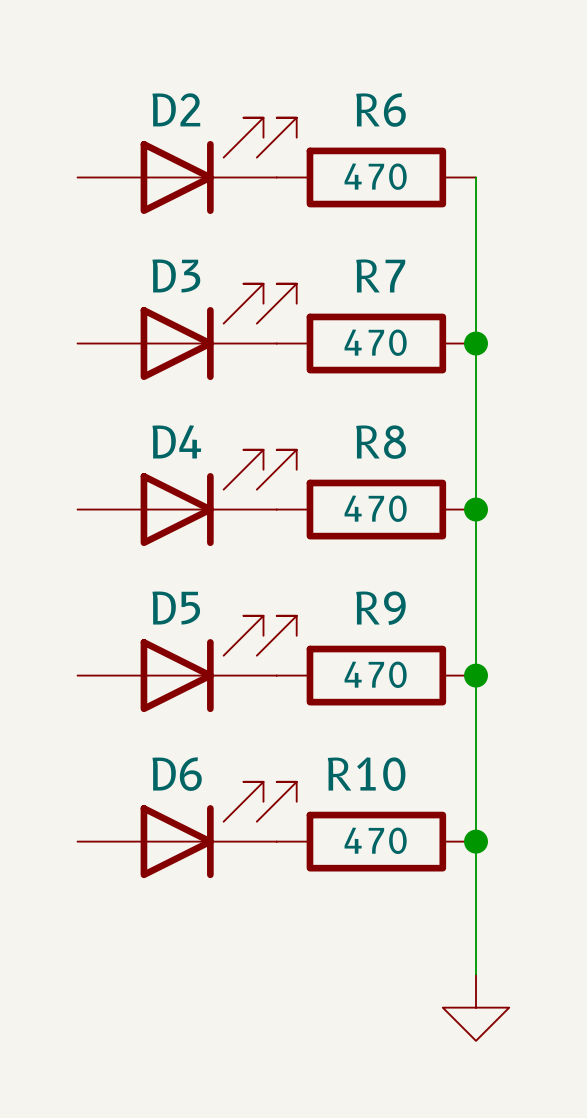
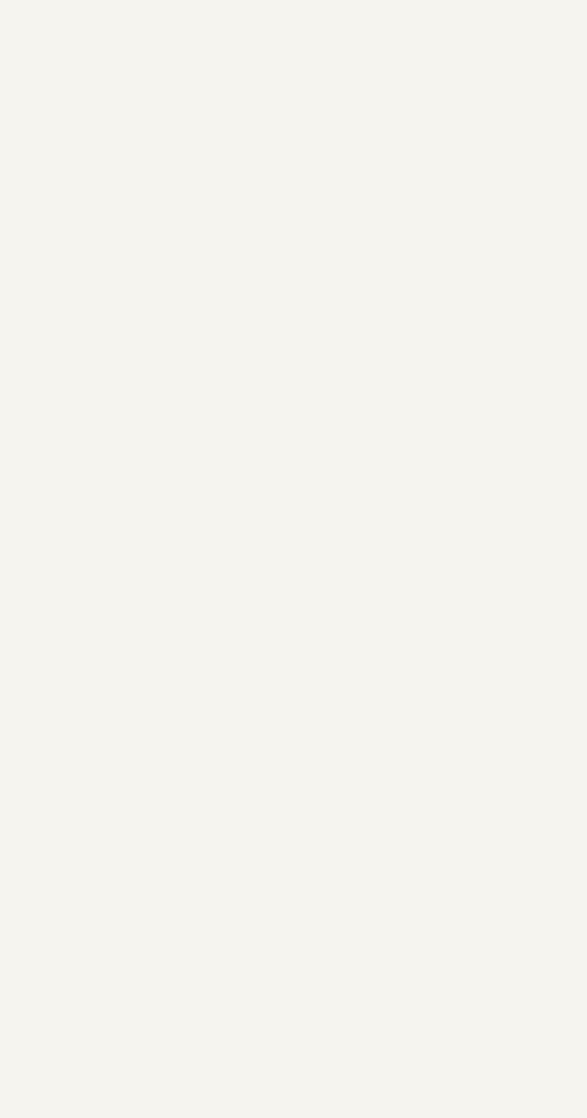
D2: (187, 165) -> none
R6: 470 (376, 177) -> none
wire: (476, 177) (476, 974) -> none
D3: (187, 331) -> none
R7: 470 (376, 343) -> none
junction: (476, 343) -> none
D4: (187, 497) -> none
R8: 470 (376, 509) -> none
junction: (476, 509) -> none
D5: (187, 663) -> none
R9: 470 (376, 675) -> none
junction: (476, 675) -> none
D6: (187, 829) -> none
R10: 470 (376, 841) -> none
junction: (476, 841) -> none
power symbol: (476, 1007) -> none

